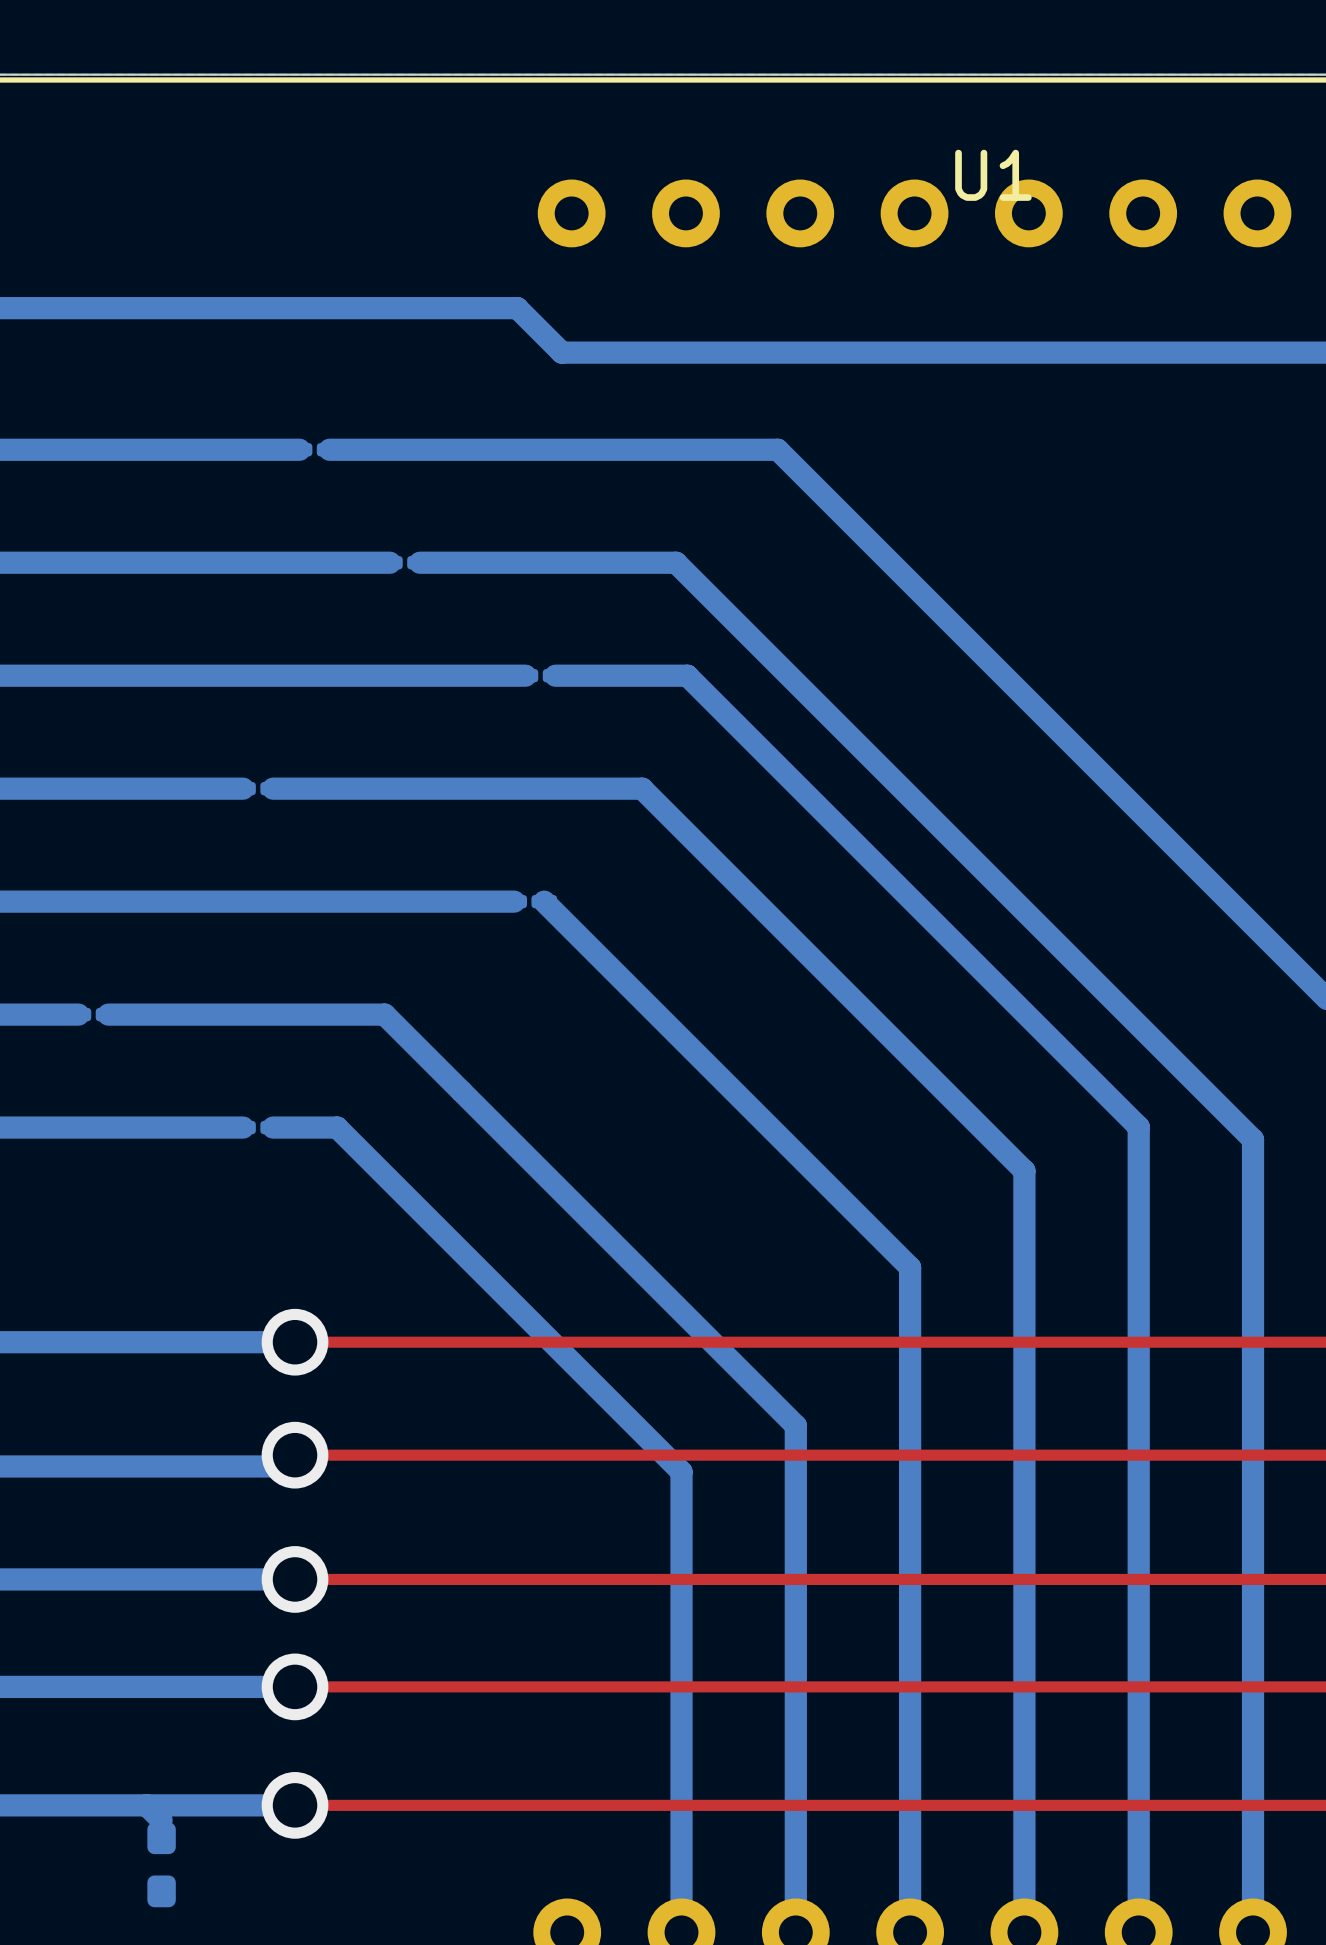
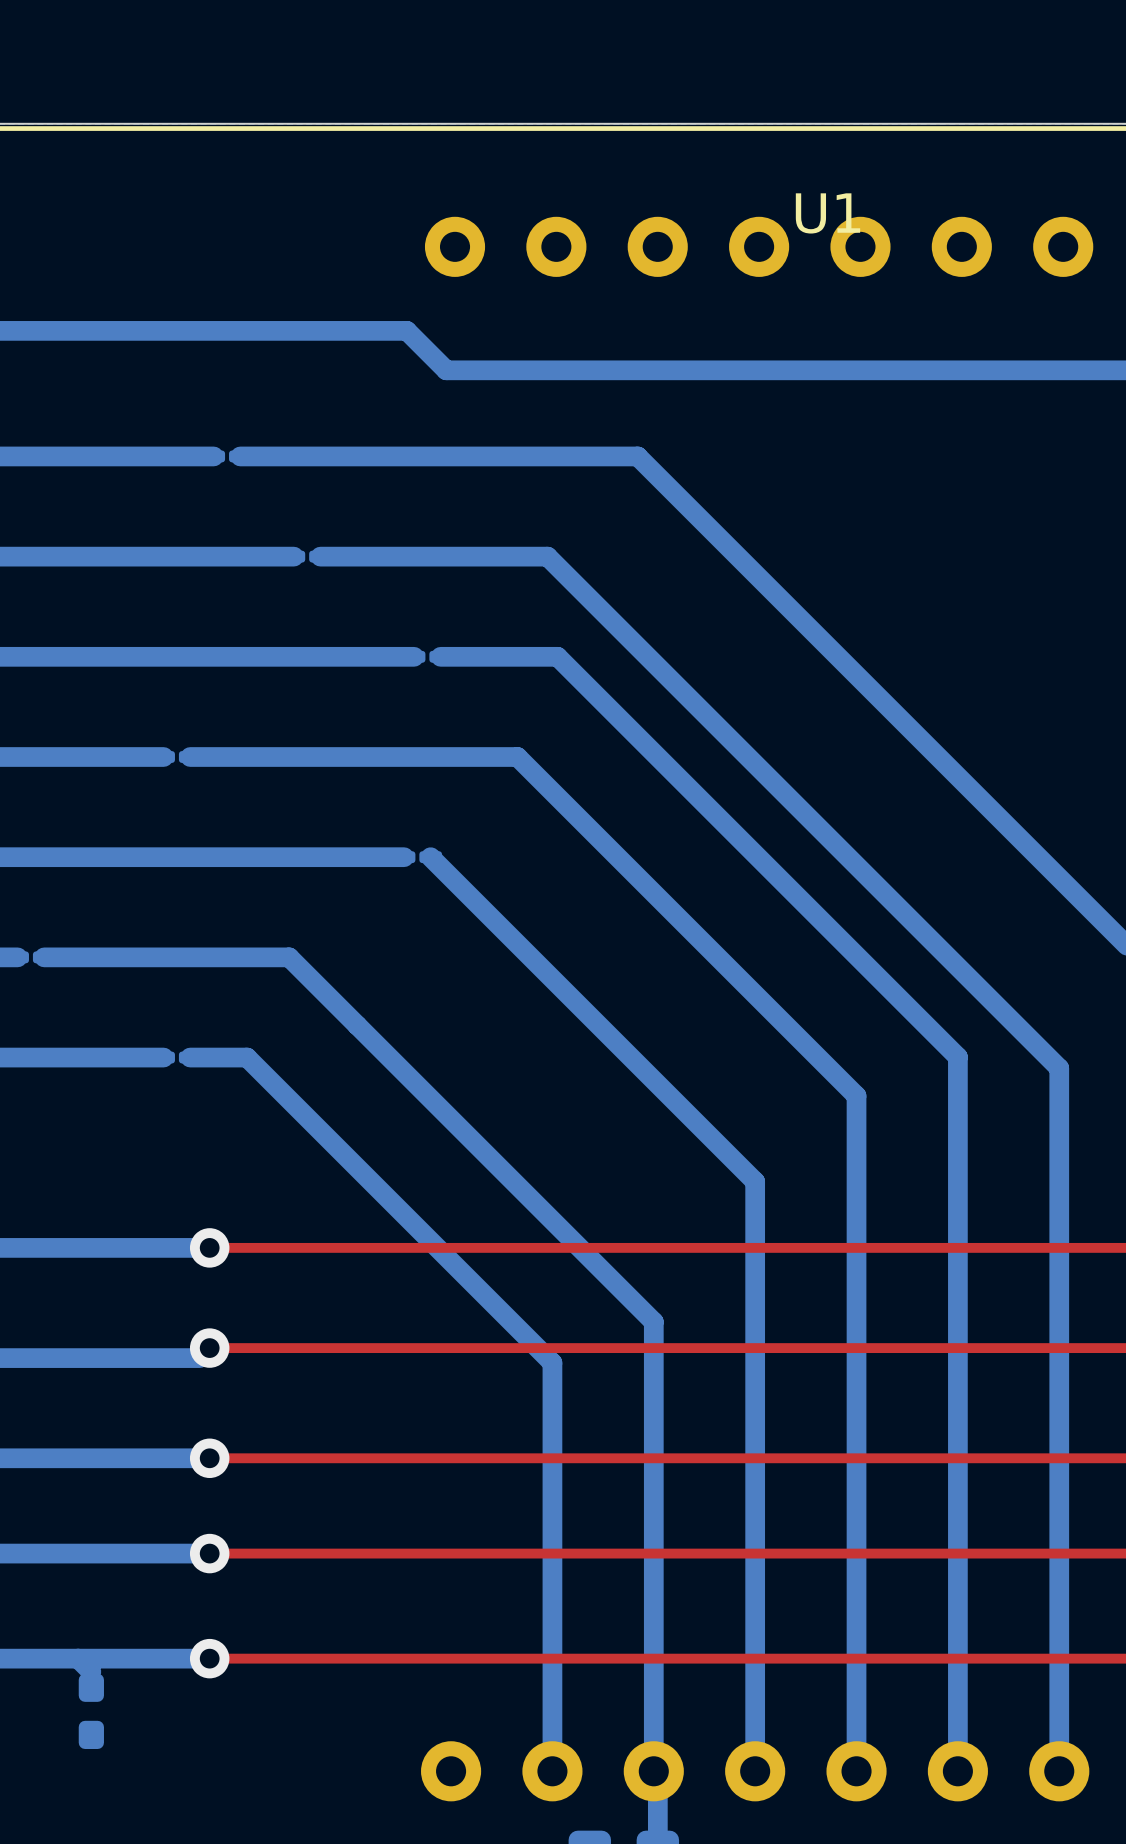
via size: [261, 1308, 329, 1376] -> [189, 1228, 230, 1268]
via size: [261, 1421, 329, 1489] -> [189, 1328, 230, 1368]
via size: [261, 1546, 329, 1613] -> [189, 1438, 230, 1479]
via size: [261, 1653, 329, 1721] -> [189, 1533, 230, 1574]
via size: [261, 1772, 329, 1839] -> [189, 1638, 230, 1679]

